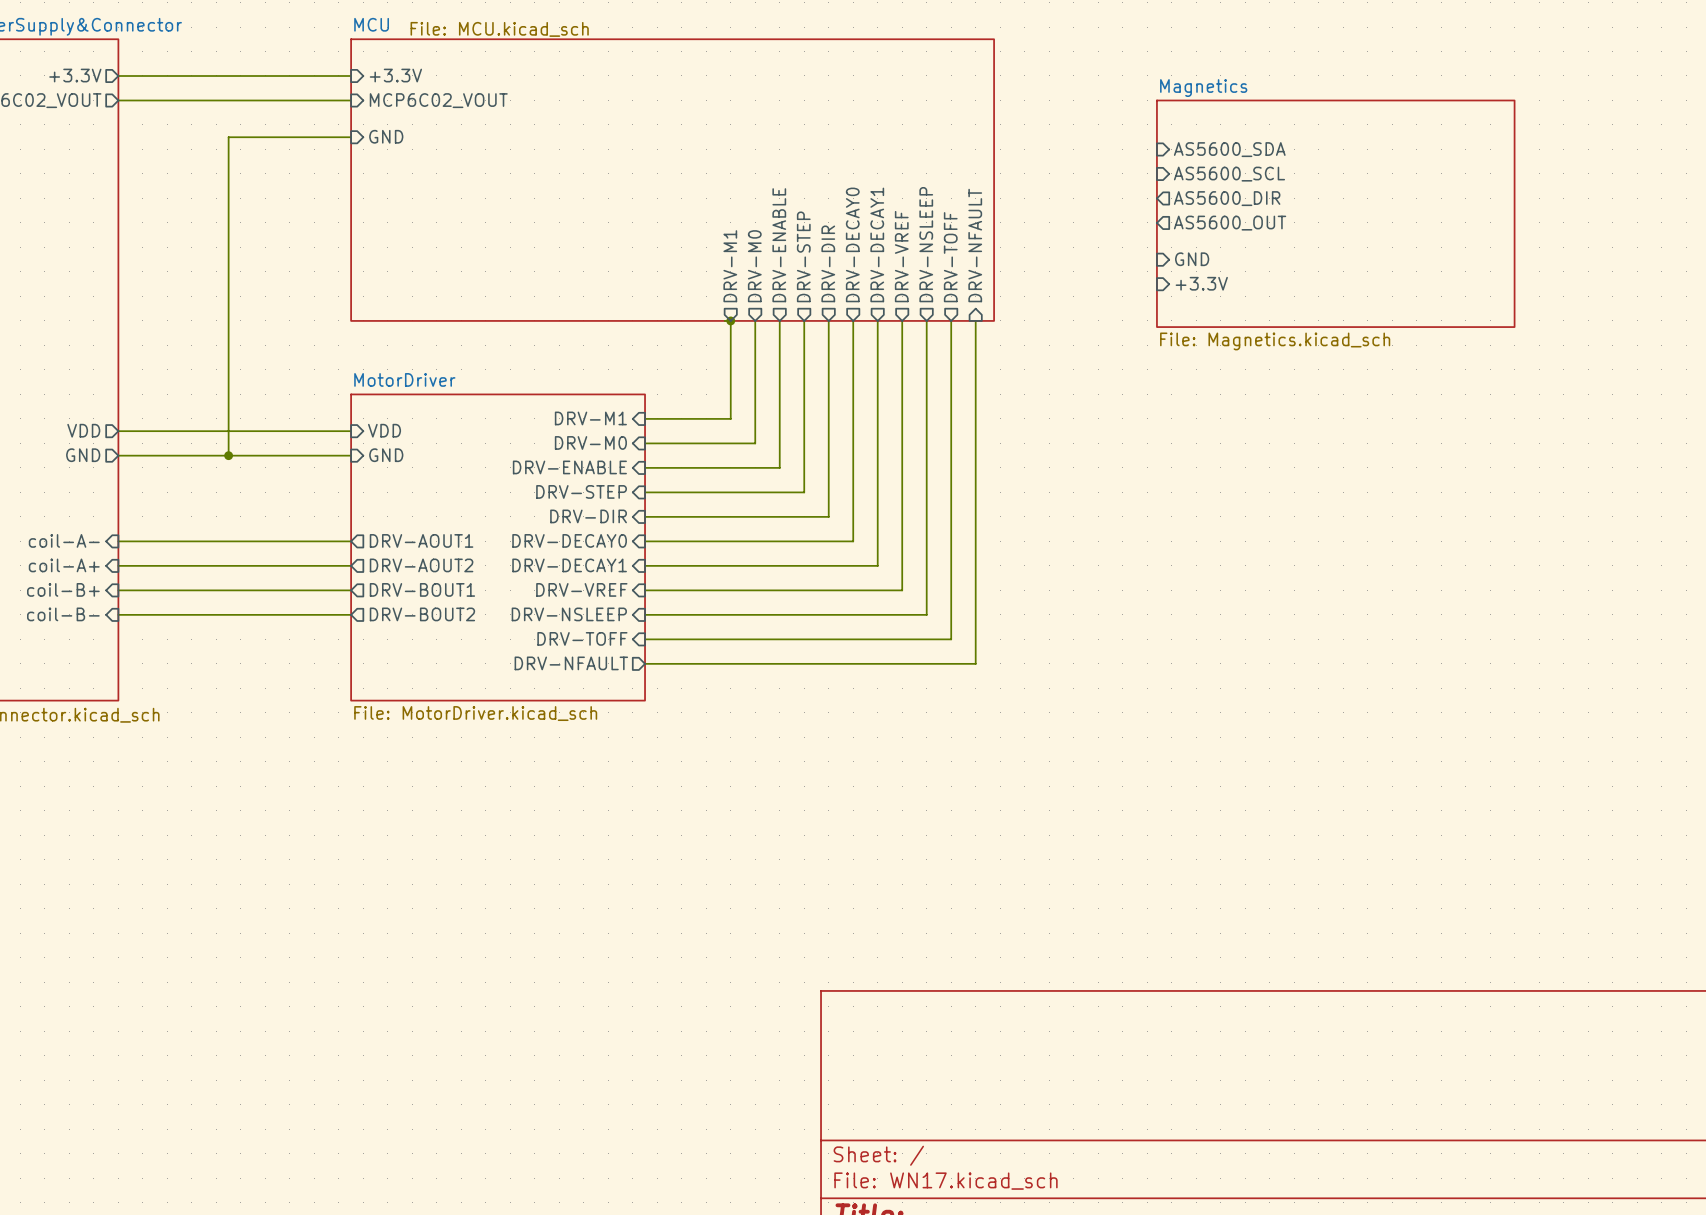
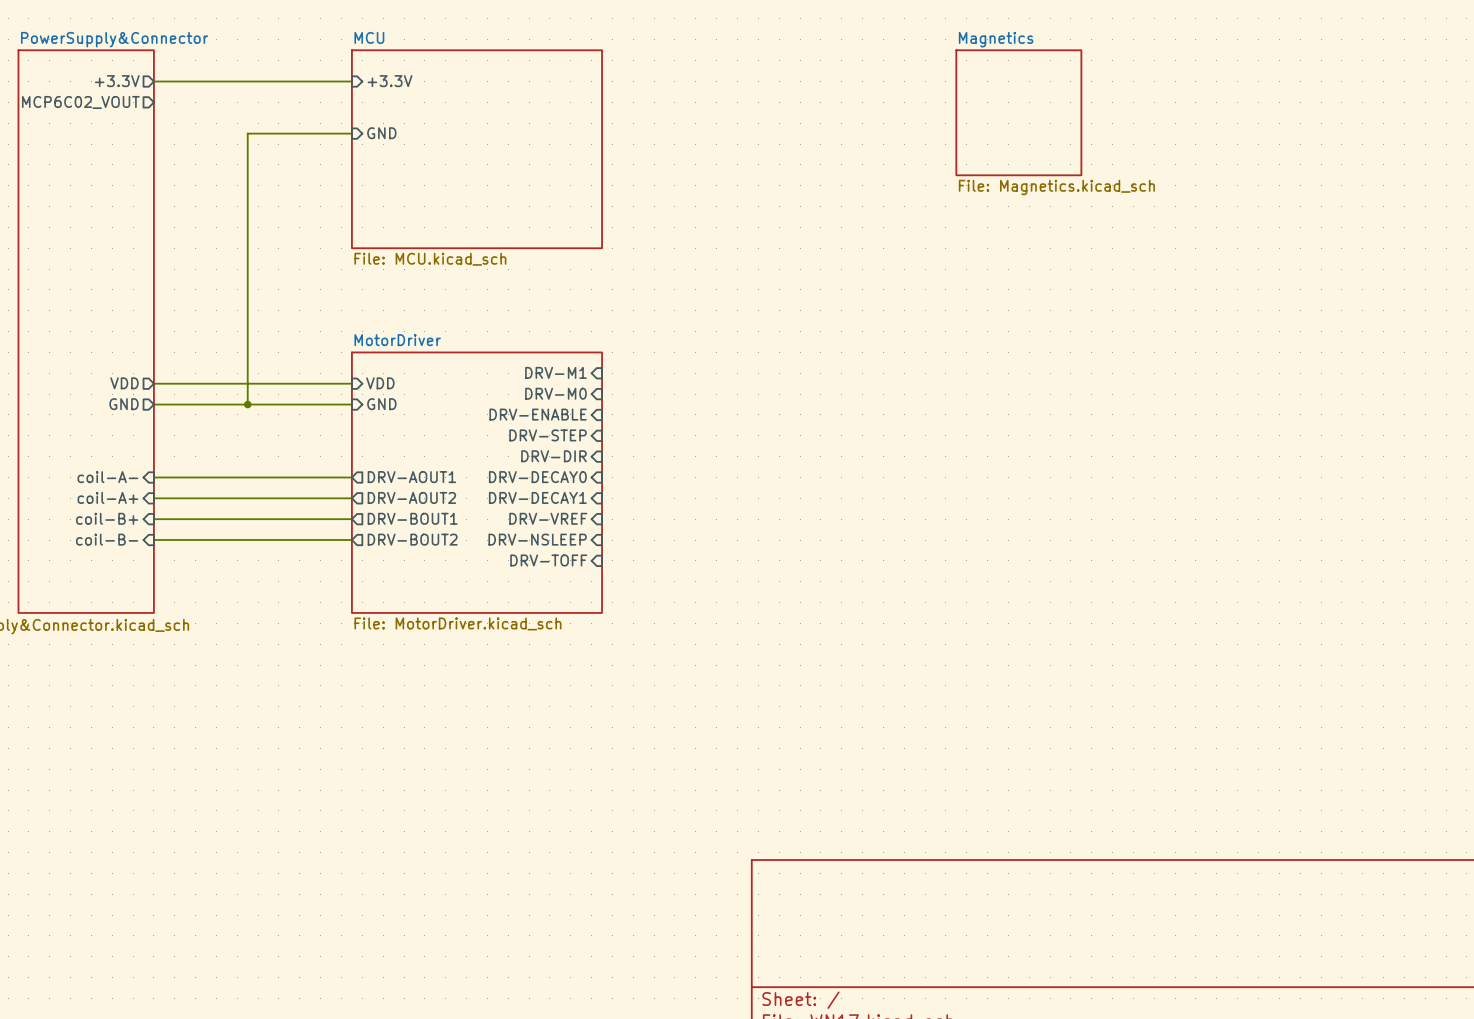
wire: (118, 100) (351, 100) -> none
sheet pin: MCP6C02_VOUT (438, 100) -> none
sheet Magnetics: none -> File: Magnetics.kicad_sch (1018, 112)
sheet pin: AS5600_SDA (1229, 149) -> none
sheet MCU: none -> File: MCU.kicad_sch (476, 149)
sheet pin: AS5600_SCL (1229, 174) -> none
sheet MCU: File: MCU.kicad_sch (672, 180) -> none
sheet pin: AS5600_DIR (1227, 198) -> none
sheet Magnetics: File: Magnetics.kicad_sch (1335, 213) -> none
sheet pin: AS5600_OUT (1230, 223) -> none
sheet pin: DRV-DECAY0 (852, 244) -> none
sheet pin: DRV-DECAY1 (877, 244) -> none
sheet pin: DRV-NSLEEP (926, 244) -> none
sheet pin: DRV-ENABLE (779, 245) -> none
sheet pin: DRV-NFAULT (975, 245) -> none
sheet pin: DRV-STEP (803, 256) -> none
sheet pin: DRV-VREF (901, 256) -> none
sheet pin: DRV-TOFF (950, 257) -> none
sheet pin: GND (1192, 259) -> none
sheet pin: DRV-DIR (828, 263) -> none
sheet pin: DRV-M1 (730, 266) -> none
sheet pin: DRV-M0 (754, 266) -> none
sheet pin: +3.3V (1201, 283) -> none
wire: (724, 320) (730, 320) (730, 418) (645, 418) -> none
junction: (730, 320) -> none
wire: (755, 320) (755, 443) (645, 443) -> none
wire: (779, 320) (779, 467) (645, 467) -> none
wire: (804, 320) (804, 492) (645, 492) -> none
wire: (828, 320) (828, 516) (645, 516) -> none
wire: (853, 320) (853, 541) (645, 541) -> none
wire: (877, 320) (877, 565) (645, 565) -> none
wire: (902, 320) (902, 590) (645, 590) -> none
wire: (926, 320) (926, 614) (645, 614) -> none
wire: (951, 320) (951, 639) (645, 639) -> none
wire: (975, 320) (975, 663) (645, 663) -> none
sheet pin: DRV-NFAULT (571, 663) -> none

